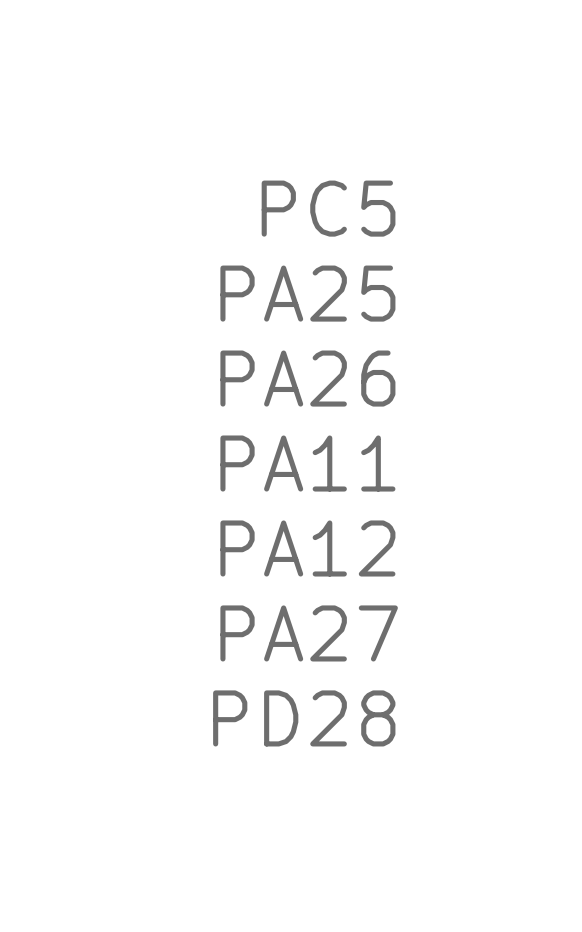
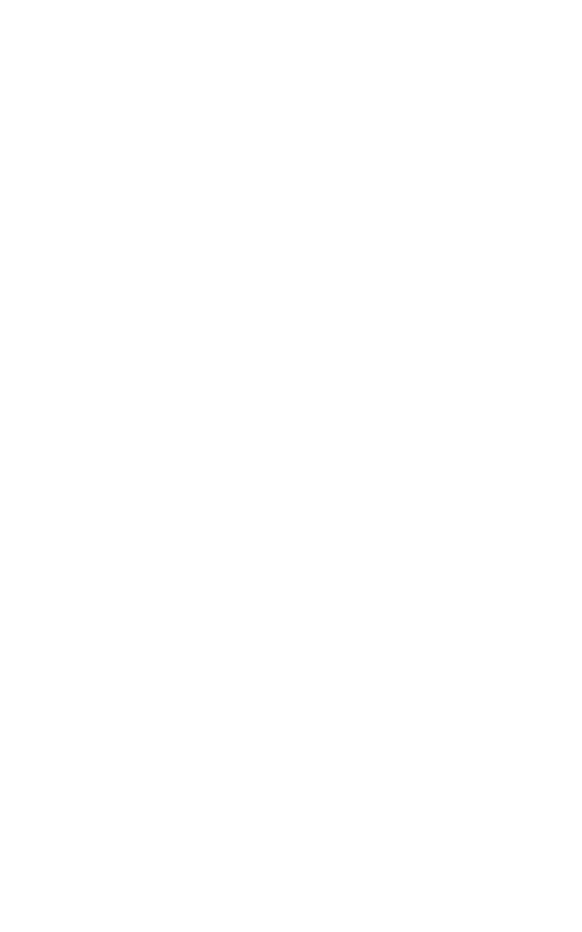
label: PC5 (328, 208) -> none
label: PA25 (307, 293) -> none
label: PA26 (307, 378) -> none
label: PA11 (307, 463) -> none
label: PA12 (307, 548) -> none
label: PA27 (309, 633) -> none
label: PD28 (304, 718) -> none

